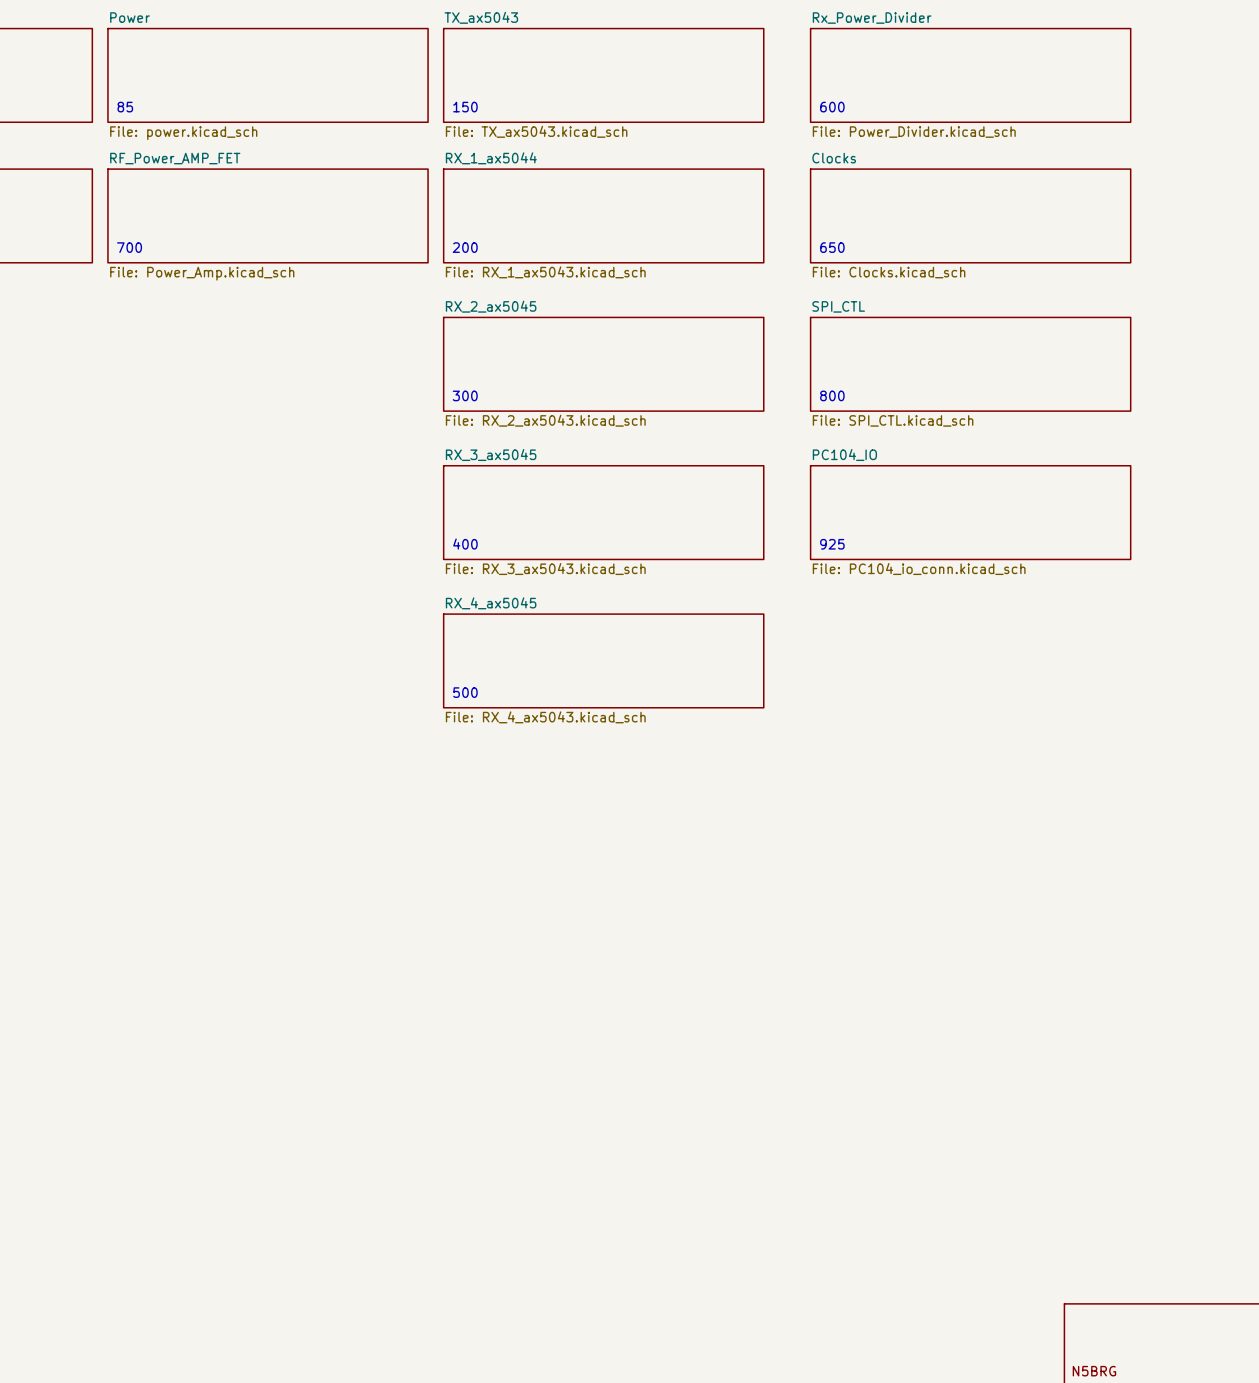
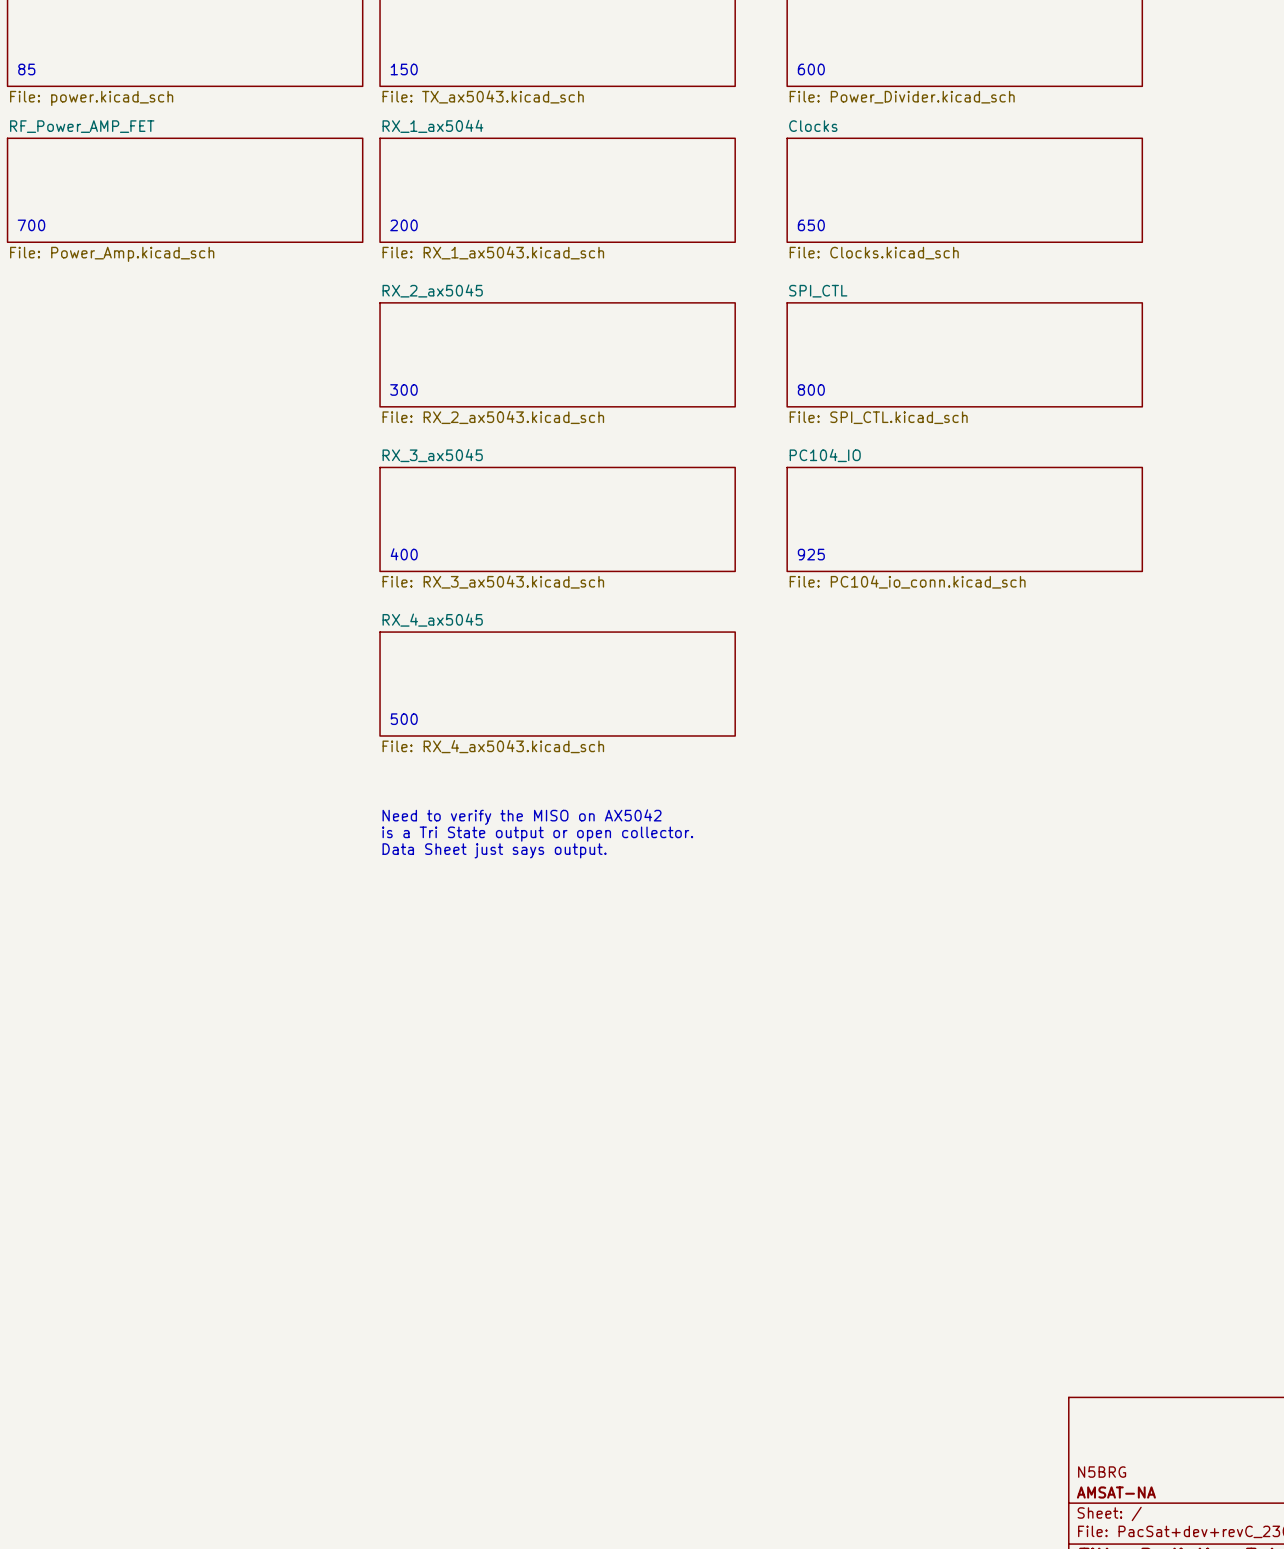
text: none -> Need to verify the MISO on AX5042 (522, 817)
text: none -> is a Tri State output or open collector. (537, 834)
text: none -> Data Sheet just says output. (494, 850)

